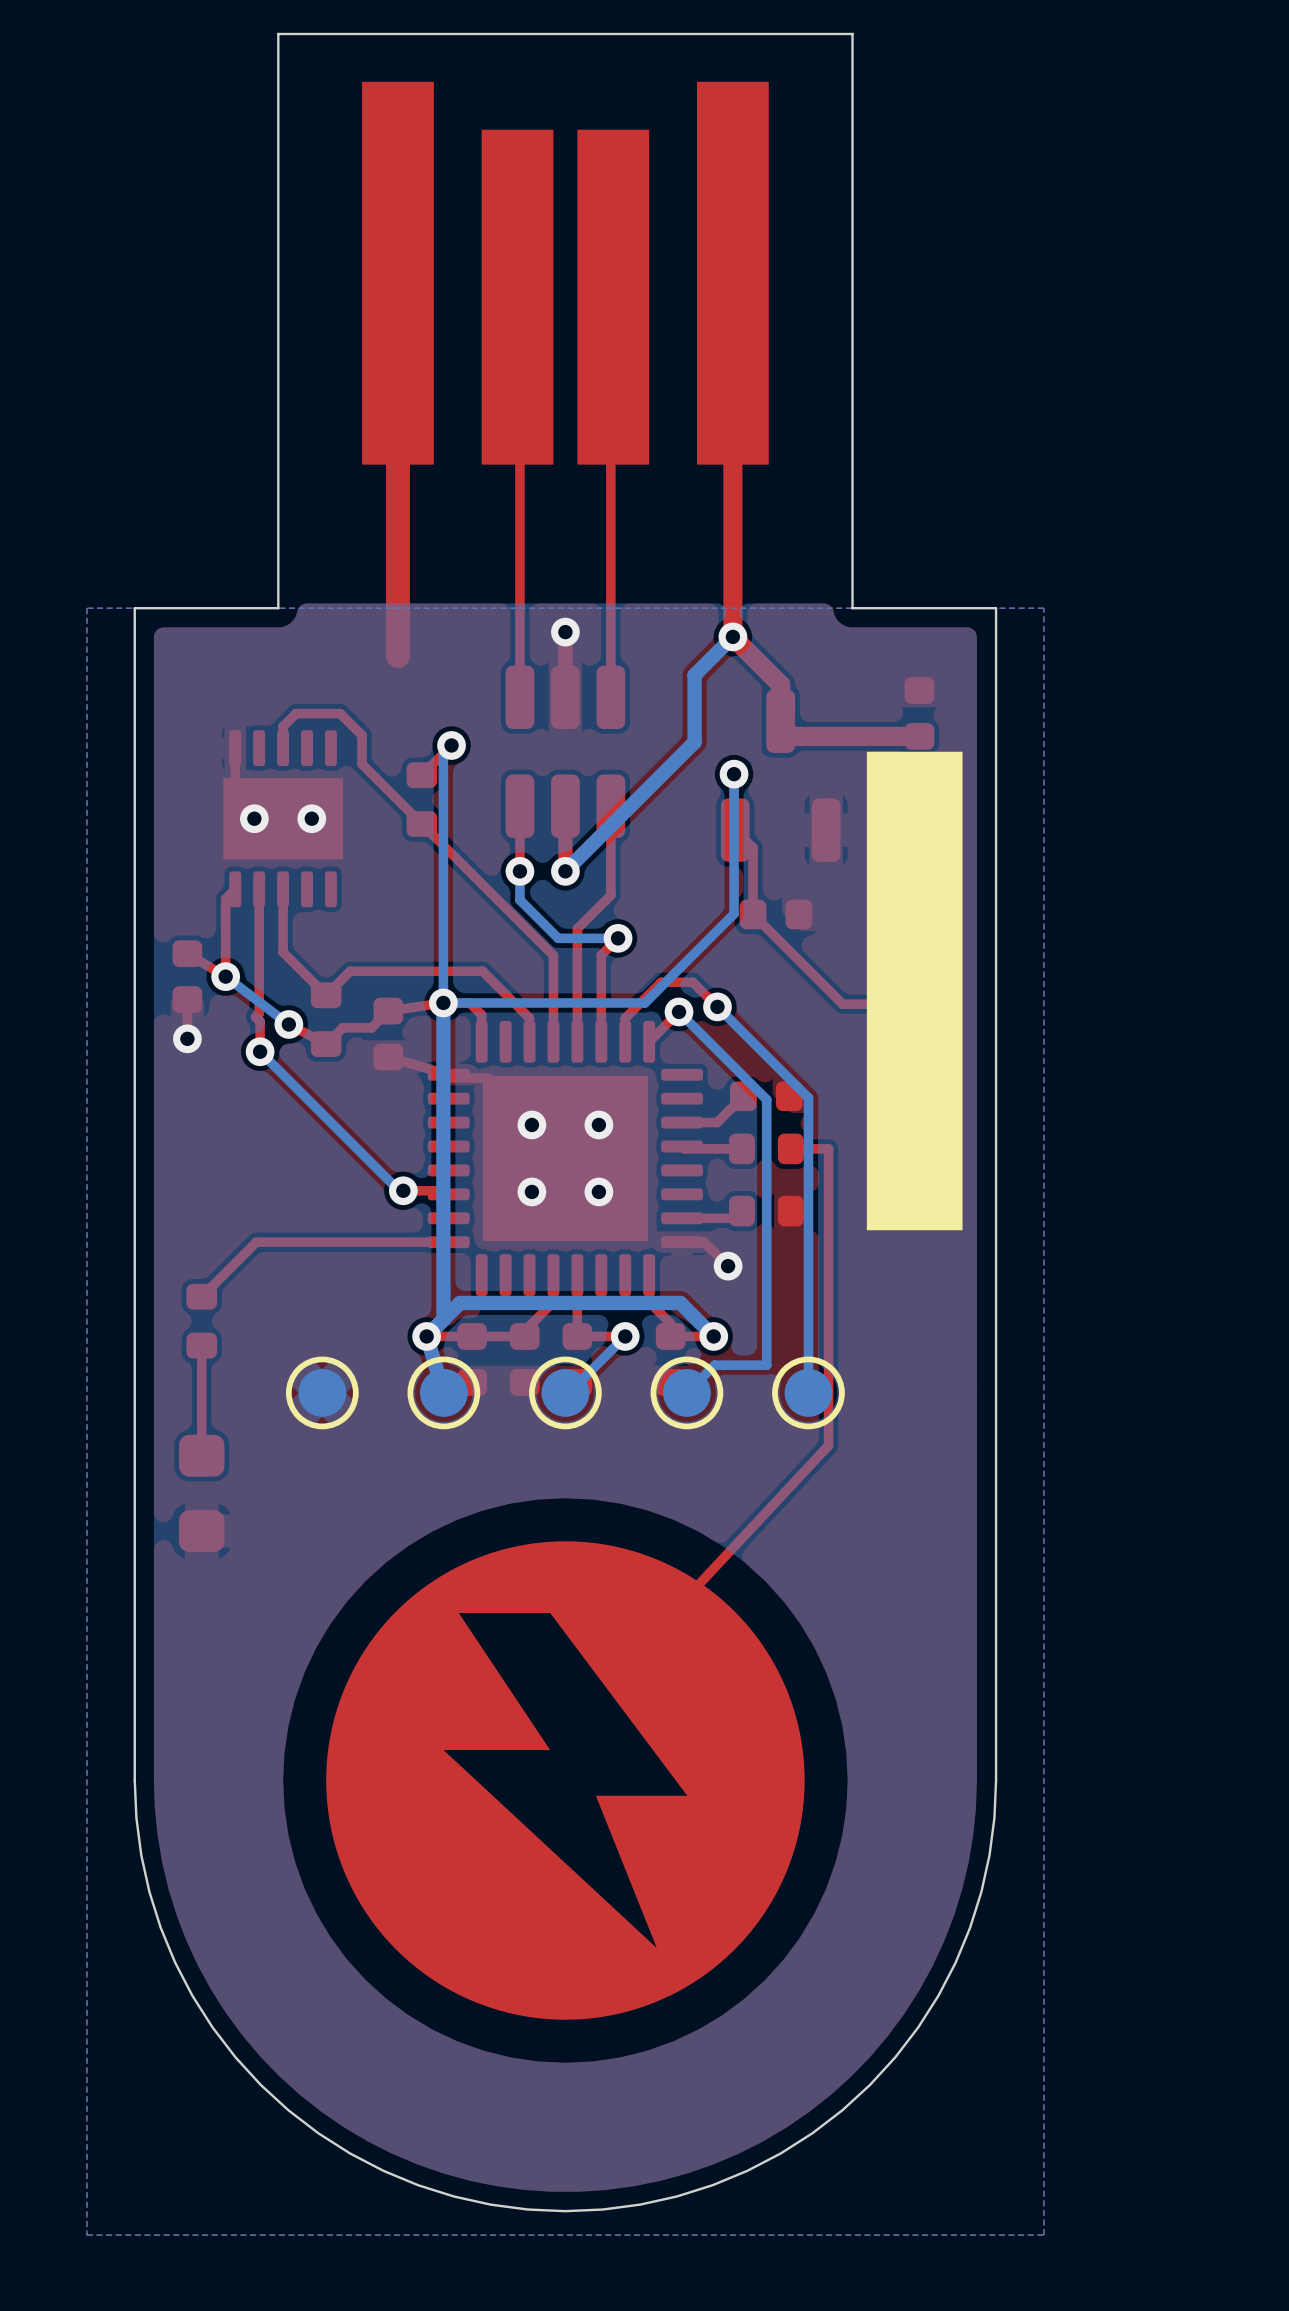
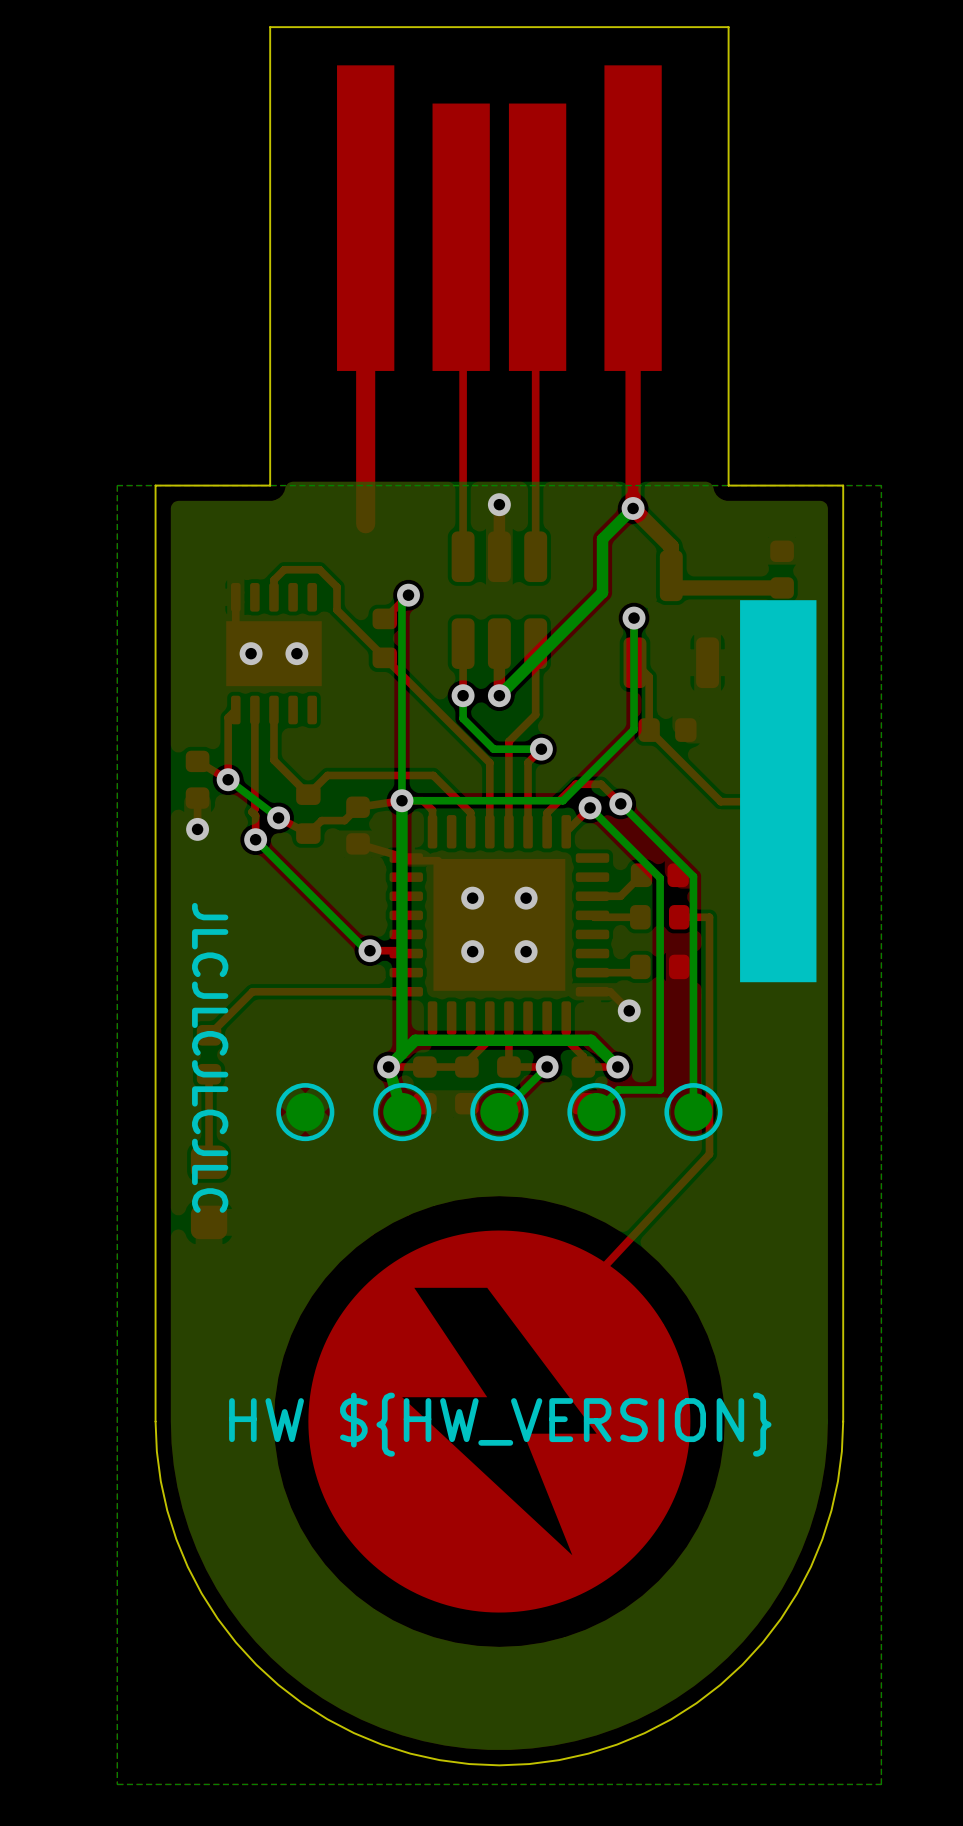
text: none -> JLCJLCJLCJLC (210, 1057)
text: none -> HW ${HW_VERSION} (500, 1424)

